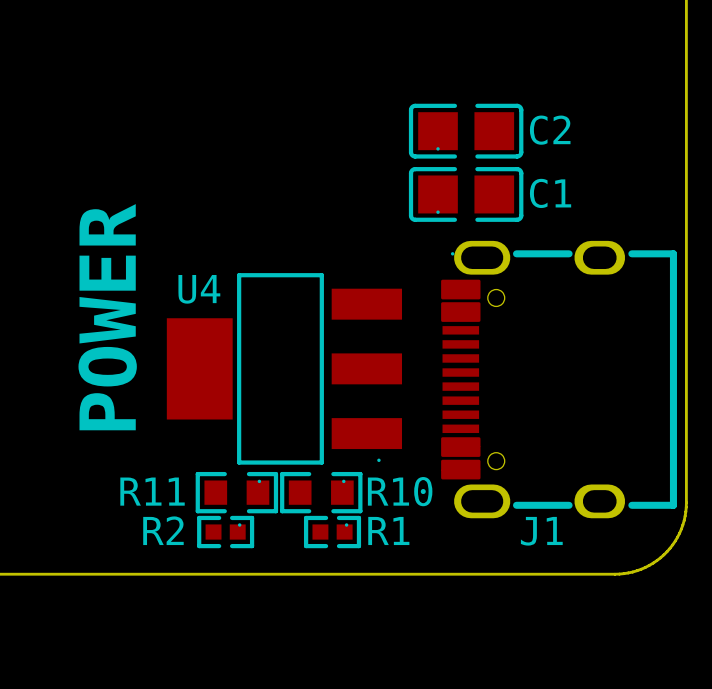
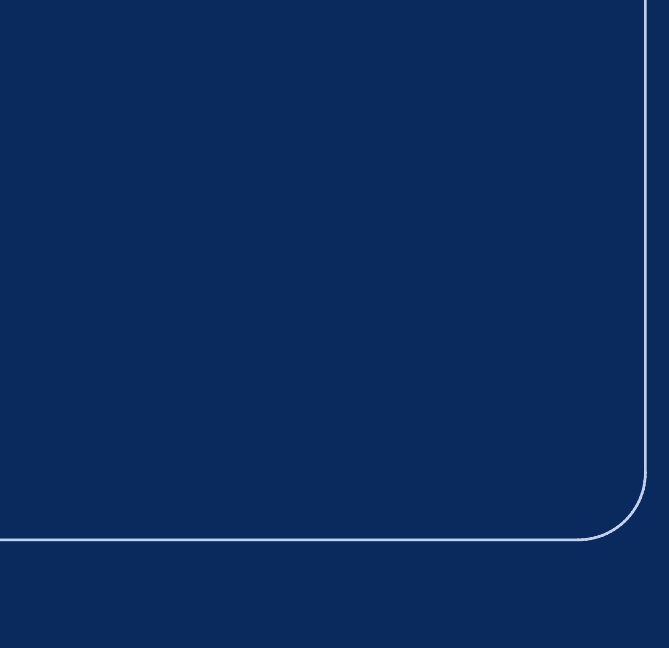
C2: (466, 131) -> none
C1: (466, 194) -> none
text: POWER (107, 317) -> none
U4: (284, 368) -> none
J1: (559, 379) -> none
R11: (236, 492) -> none
R10: (321, 492) -> none
R2: (225, 532) -> none
R1: (332, 532) -> none

